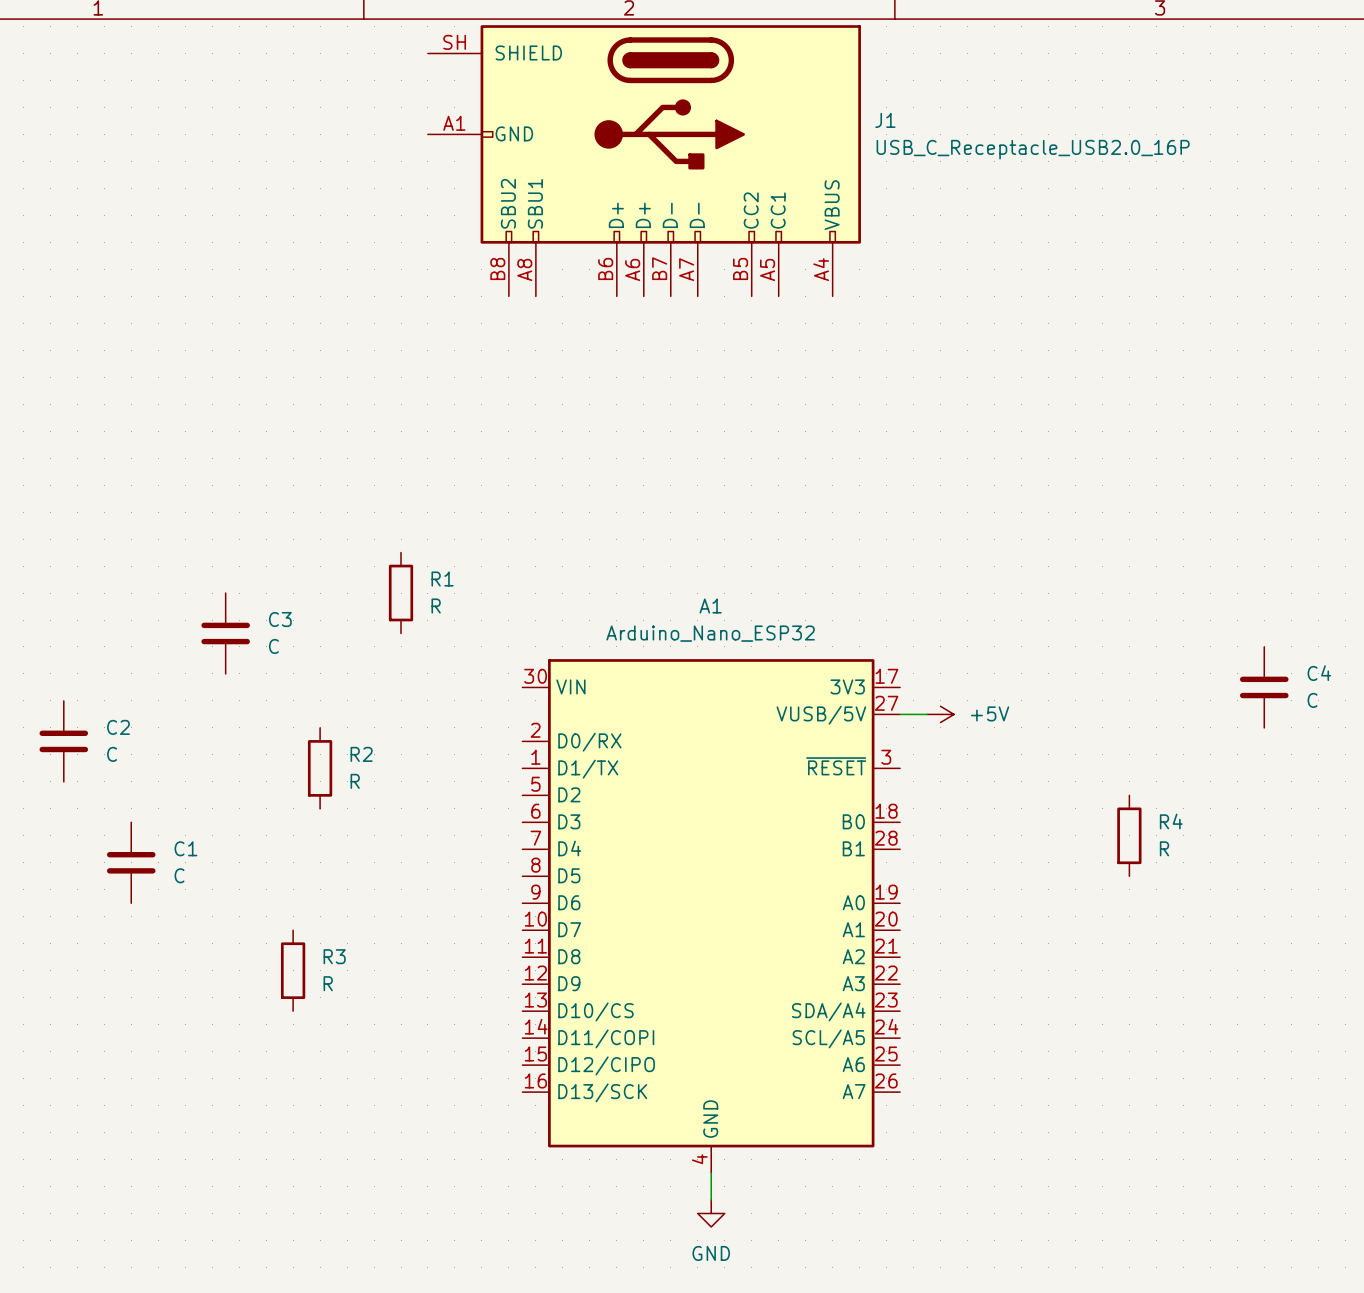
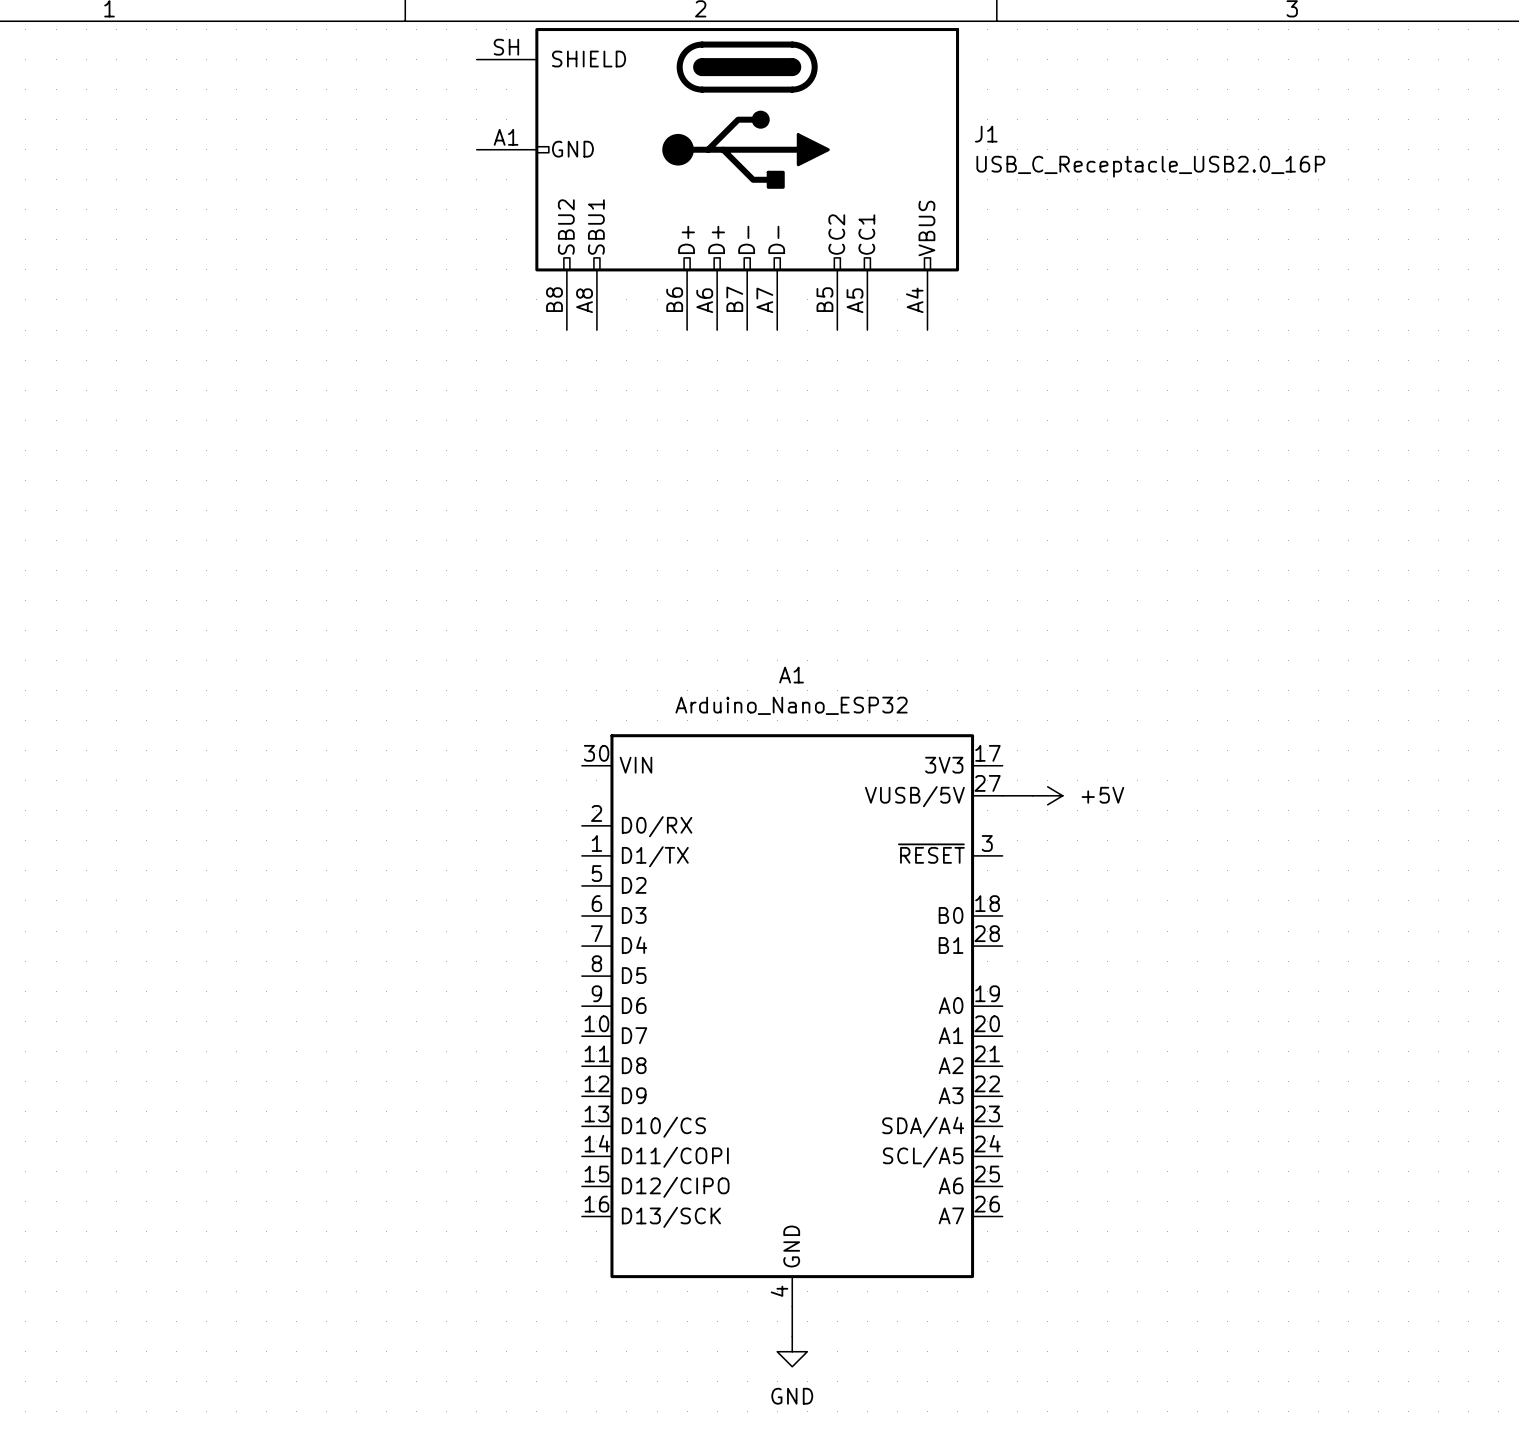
R1: R (401, 593) -> none
C3: C (225, 633) -> none
C4: C (1264, 687) -> none
C2: C (63, 741) -> none
R2: R (320, 768) -> none
R4: R (1129, 835) -> none
C1: C (131, 862) -> none
R3: R (293, 970) -> none

